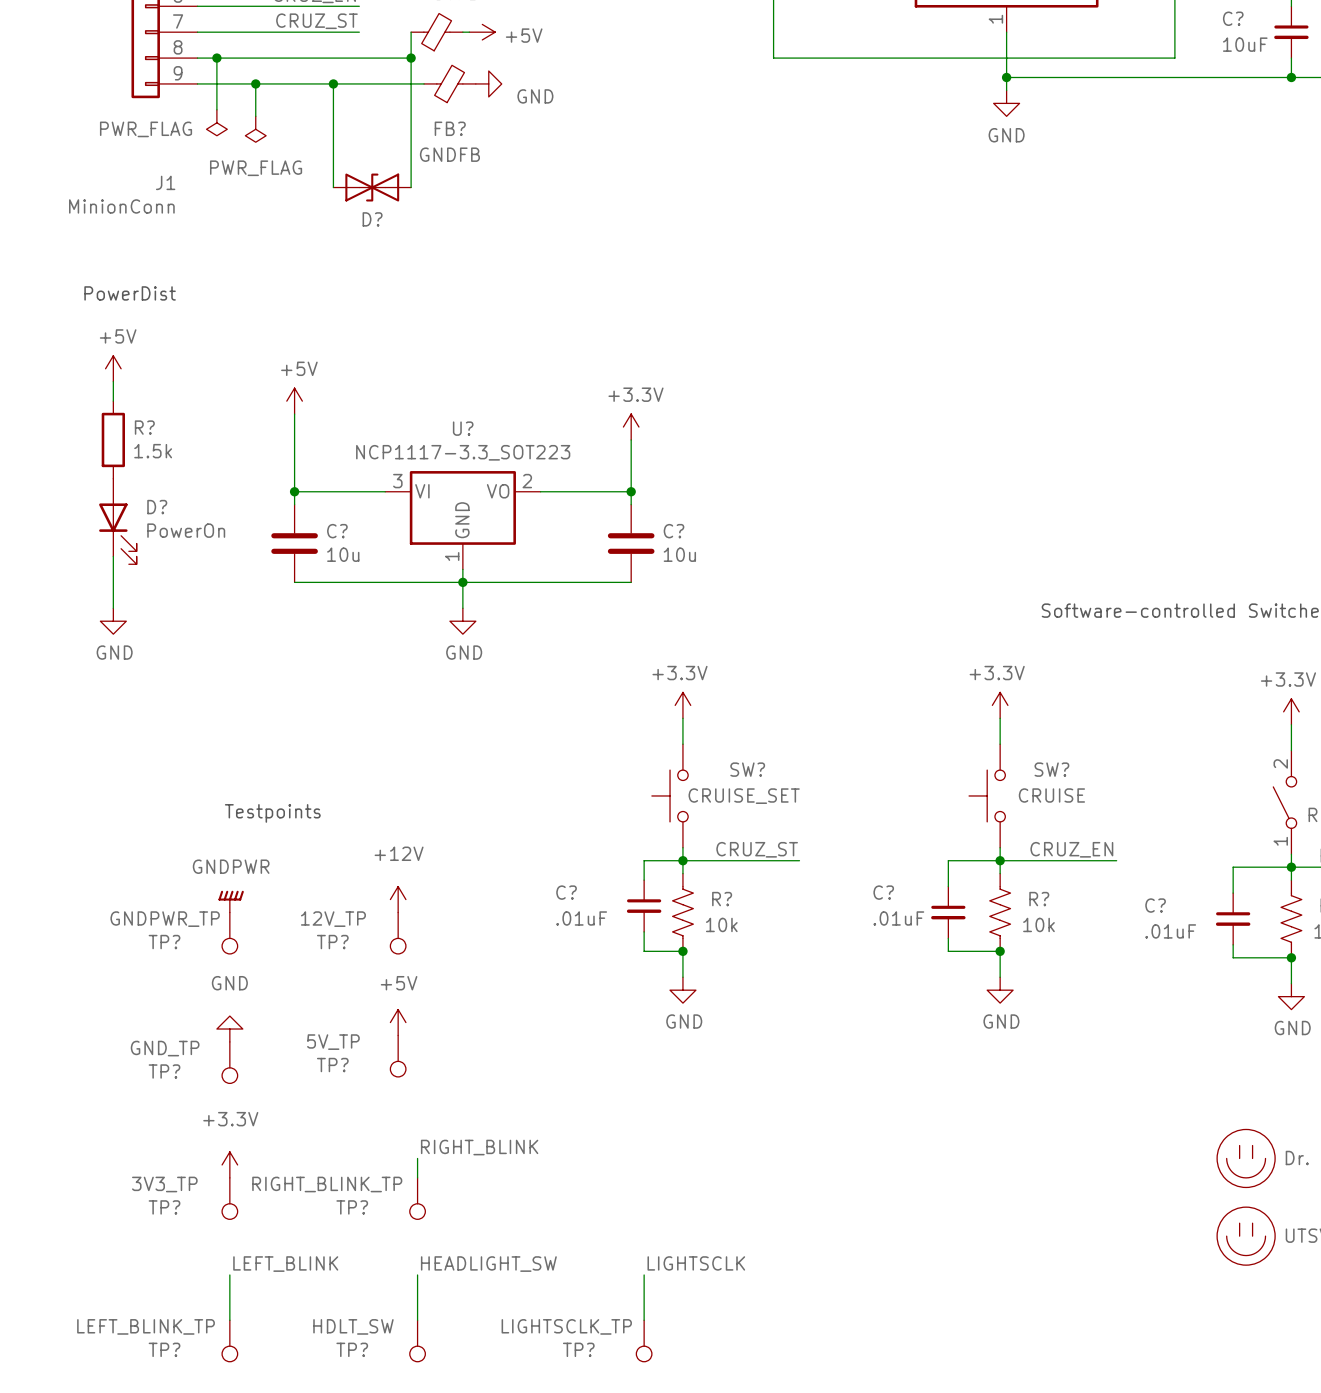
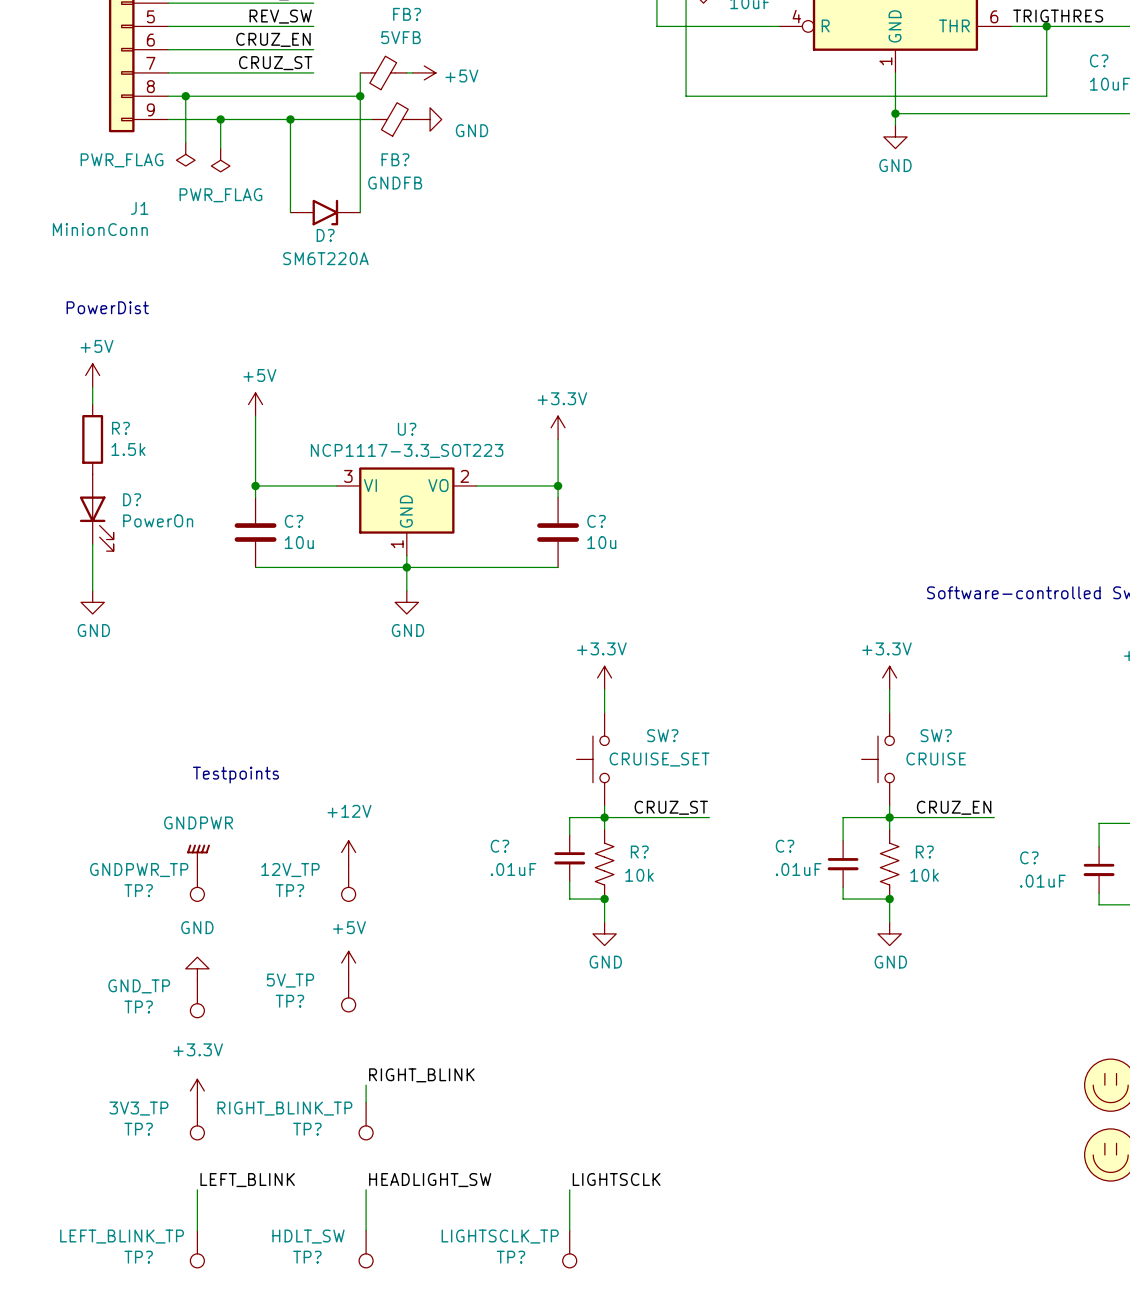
D? symbol: [333, 173, 412, 202] -> [290, 199, 361, 226]
D? value: none -> SM6T220A (325, 258)

